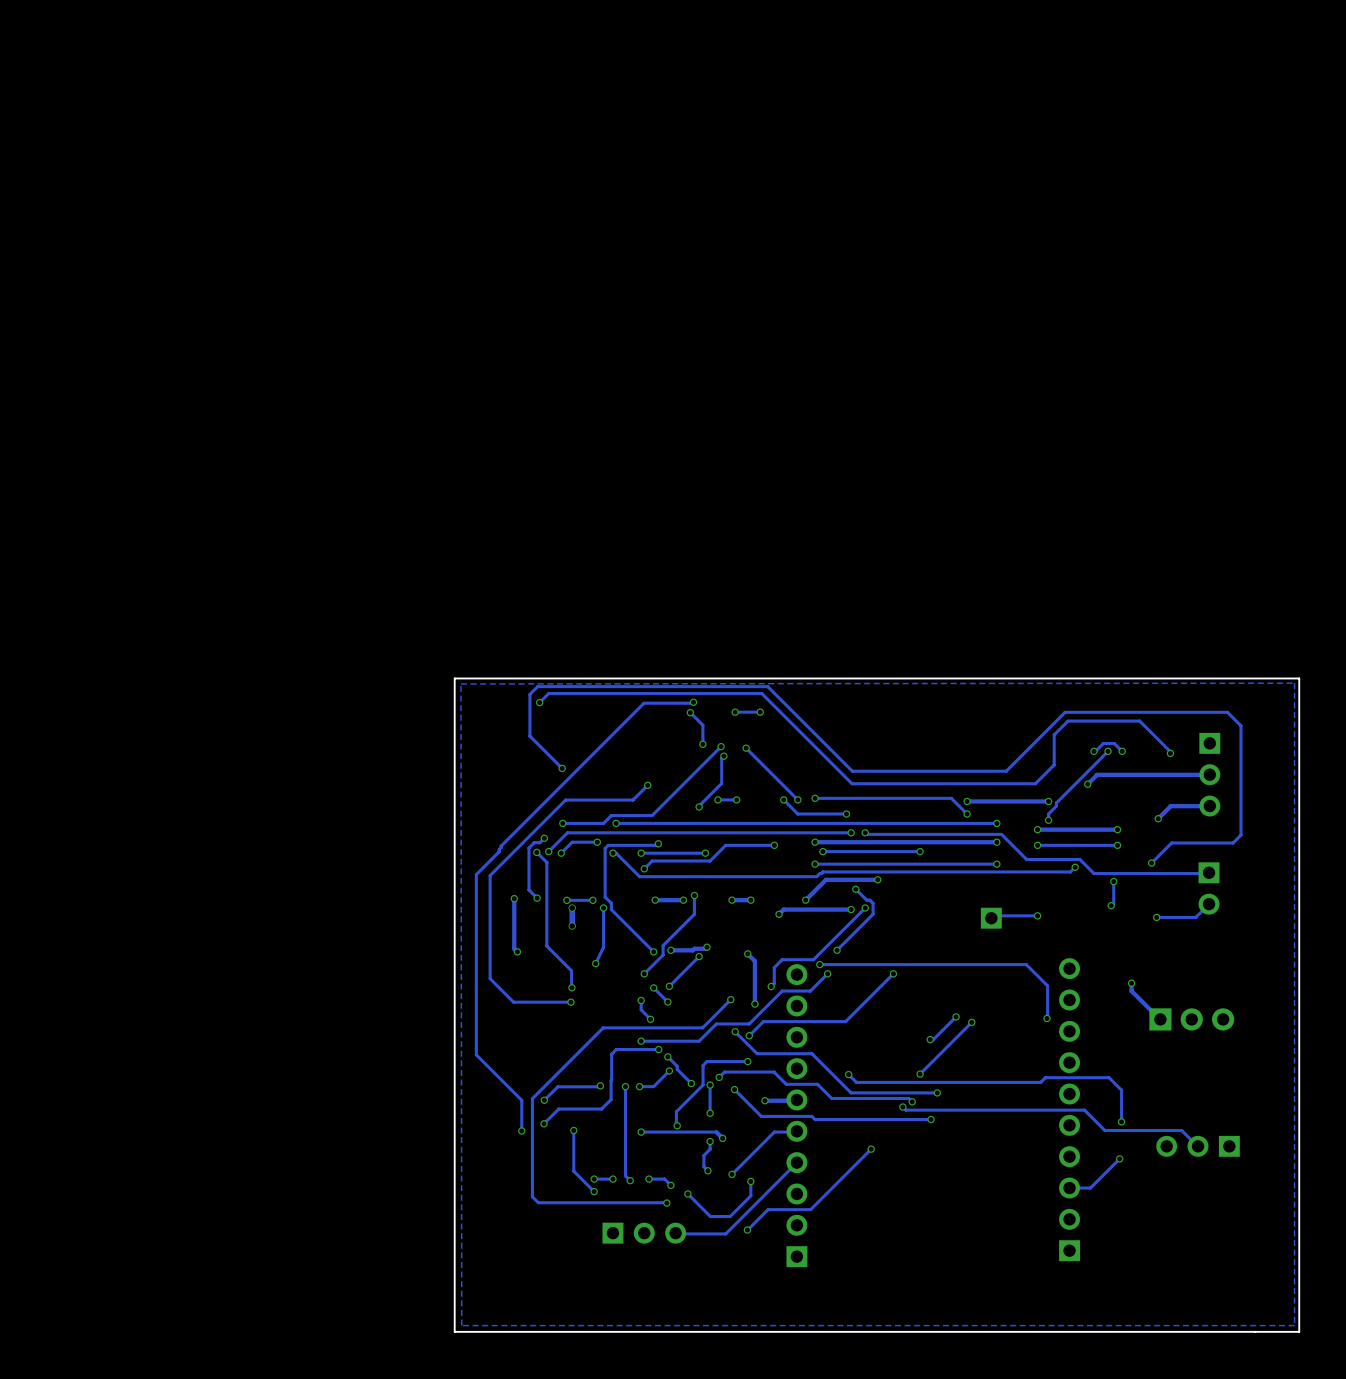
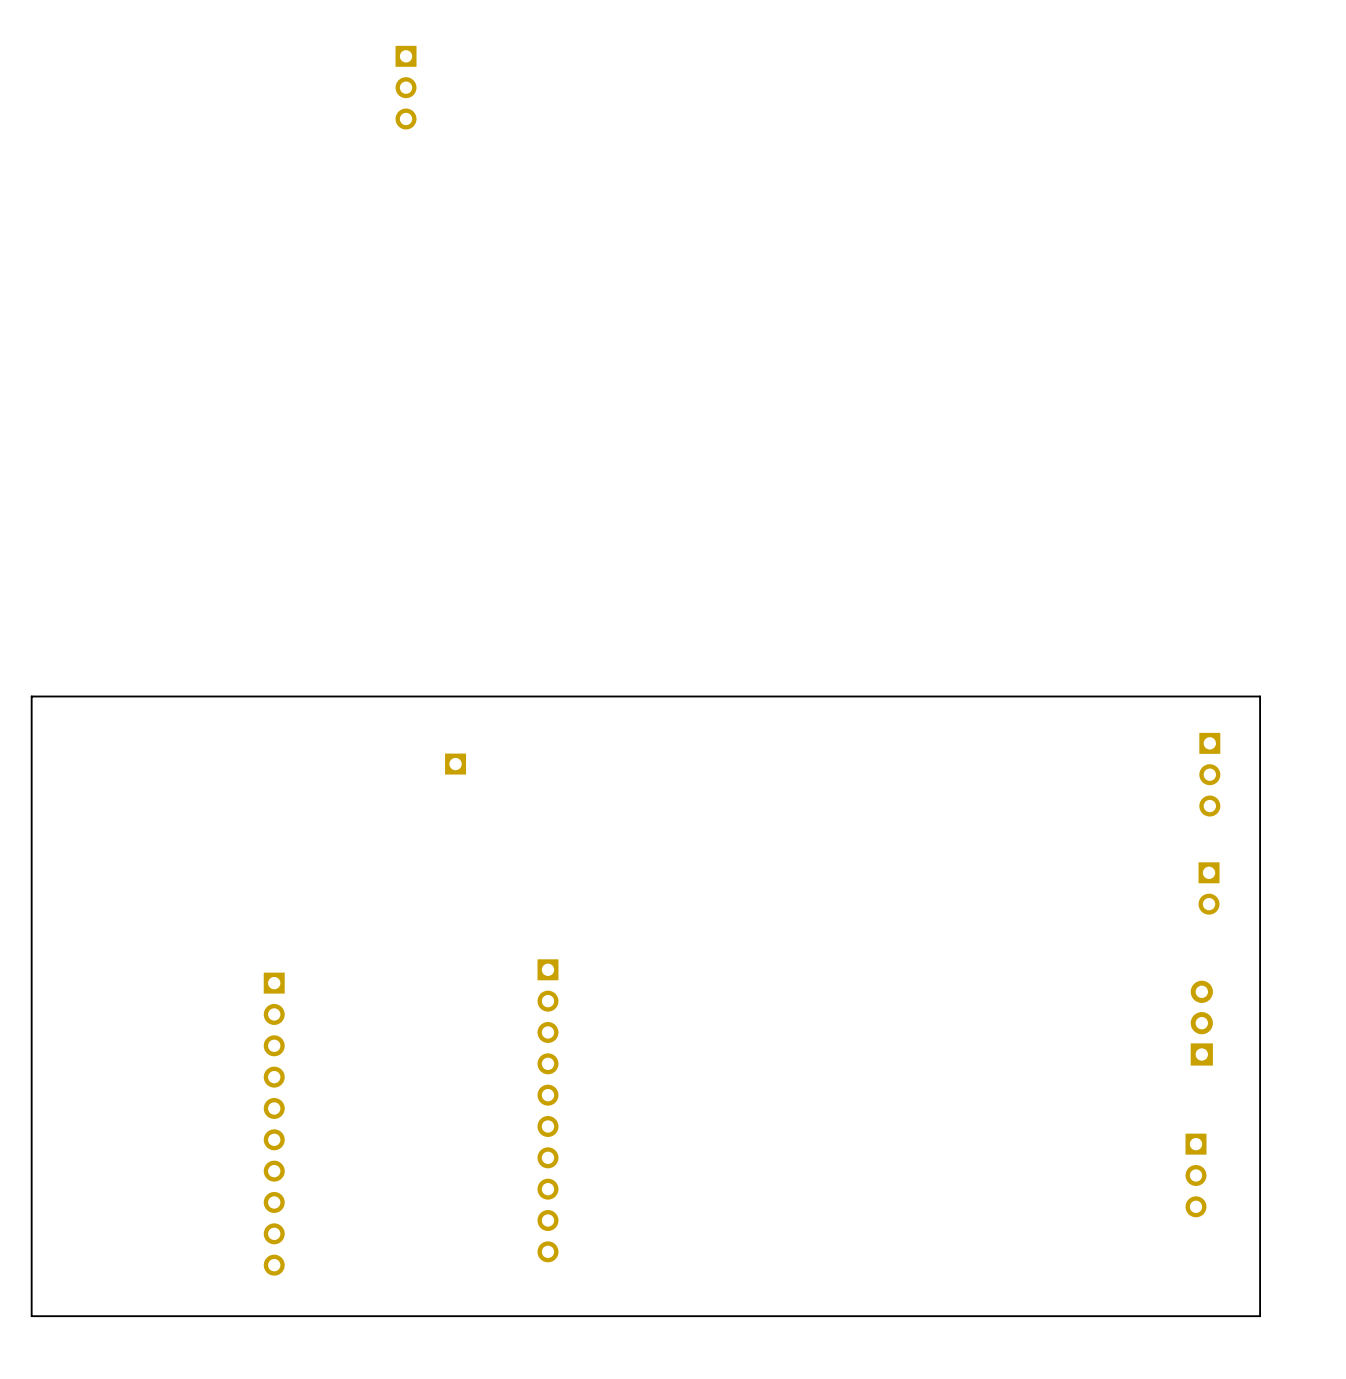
part: none -> (406, 87)
board edge: (1299, 678) (454, 678) (454, 1331) (1299, 1331) (1299, 678) -> (1260, 696) (1260, 1316) (31, 1316) (31, 696) (1260, 696)
zone outline: (1294, 683) (1294, 1325) (461, 1325) (460, 683) (1294, 683) -> none
track: (539, 702) (548, 693) (761, 693) (852, 783) (1035, 783) (1054, 764) (1054, 734) (1067, 721) (1139, 721) (1170, 753) -> none
via: (539, 702) -> none
track: (693, 702) (643, 703) (501, 846) (499, 851) (476, 874) (476, 1054) (521, 1100) (521, 1130) -> none
via: (693, 702) -> none
track: (690, 712) (702, 725) (702, 744) -> none
via: (690, 712) -> none
via: (735, 712) -> none
track: (760, 712) (735, 712) -> none
via: (760, 712) -> none
via: (702, 744) -> none
track: (721, 746) (652, 815) (611, 815) (603, 823) (562, 823) -> none
via: (721, 746) -> none
track: (746, 748) (797, 799) -> none
via: (746, 748) -> none
via: (1093, 751) -> none
track: (1108, 751) (1056, 803) (1056, 806) (1048, 814) (1048, 820) -> none
via: (1108, 751) -> none
track: (1122, 751) (1114, 743) (1103, 743) (1093, 751) -> none
via: (1122, 751) -> none
via: (1170, 753) -> none
track: (723, 756) (721, 758) (721, 783) (699, 806) -> none
via: (723, 756) -> none
part: none -> (455, 764)
track: (562, 768) (529, 736) (529, 694) (537, 686) (767, 686) (852, 771) (1006, 771) (1065, 712) (1227, 712) (1240, 725) (1240, 835) (1233, 842) (1171, 842) (1151, 863) -> none
via: (562, 768) -> none
track: (1209, 774) (1097, 774) (1087, 784) -> none
via: (1087, 784) -> none
track: (647, 785) (633, 800) (565, 800) (490, 875) (490, 978) (513, 1002) (570, 1002) -> none
via: (647, 785) -> none
track: (815, 798) (951, 798) (967, 814) -> none
via: (815, 798) -> none
via: (717, 799) -> none
track: (736, 799) (717, 799) -> none
via: (736, 799) -> none
track: (783, 799) (797, 814) (846, 814) -> none
via: (783, 799) -> none
via: (797, 799) -> none
via: (967, 801) -> none
track: (1048, 801) (967, 801) -> none
via: (1048, 801) -> none
via: (699, 806) -> none
track: (1209, 806) (1170, 806) (1158, 818) -> none
via: (846, 814) -> none
via: (967, 814) -> none
via: (1158, 818) -> none
via: (1048, 820) -> none
via: (562, 823) -> none
via: (616, 823) -> none
track: (996, 823) (616, 823) -> none
via: (996, 823) -> none
via: (1037, 829) -> none
track: (1117, 829) (1037, 829) -> none
via: (1117, 829) -> none
track: (851, 832) (567, 832) (548, 851) -> none
via: (851, 832) -> none
track: (865, 832) (866, 834) (1001, 834) (1026, 859) (1079, 859) (1093, 873) (1209, 872) -> none
via: (865, 832) -> none
track: (544, 838) (539, 842) (534, 842) (528, 848) (528, 890) (537, 898) -> none
via: (544, 838) -> none
track: (597, 842) (572, 842) (561, 853) -> none
via: (597, 842) -> none
via: (815, 842) -> none
track: (996, 842) (815, 842) -> none
via: (996, 842) -> none
track: (658, 843) (656, 845) (608, 845) (605, 848) (605, 897) (611, 903) (611, 909) (653, 951) -> none
via: (658, 843) -> none
track: (774, 845) (725, 845) (710, 861) (652, 861) (644, 868) -> none
via: (774, 845) -> none
via: (1037, 845) -> none
track: (1117, 845) (1037, 845) -> none
via: (1117, 845) -> none
via: (548, 851) -> none
via: (822, 851) -> none
track: (920, 851) (822, 851) -> none
via: (920, 851) -> none
track: (536, 852) (546, 862) (546, 946) (571, 970) (571, 987) -> none
via: (536, 852) -> none
via: (561, 853) -> none
track: (612, 853) (616, 853) (639, 876) (816, 876) (822, 871) (1070, 871) (1075, 867) -> none
via: (612, 853) -> none
via: (641, 853) -> none
track: (705, 853) (641, 853) -> none
via: (705, 853) -> none
via: (1151, 863) -> none
via: (815, 864) -> none
track: (996, 864) (815, 864) -> none
via: (996, 864) -> none
via: (1075, 867) -> none
via: (644, 868) -> none
track: (877, 879) (826, 879) (805, 900) -> none
via: (877, 879) -> none
track: (1113, 881) (1113, 903) (1111, 905) -> none
via: (1113, 881) -> none
track: (855, 889) (866, 900) (873, 903) (873, 914) (837, 950) -> none
via: (855, 889) -> none
track: (694, 895) (694, 914) (663, 945) (663, 955) (644, 973) -> none
via: (694, 895) -> none
track: (514, 898) (514, 948) (517, 951) -> none
via: (514, 898) -> none
via: (537, 898) -> none
via: (566, 900) -> none
track: (592, 900) (566, 900) -> none
via: (592, 900) -> none
via: (655, 900) -> none
track: (683, 900) (655, 900) -> none
via: (683, 900) -> none
via: (732, 900) -> none
track: (750, 900) (732, 900) -> none
via: (750, 900) -> none
via: (805, 900) -> none
track: (1209, 904) (1195, 917) (1156, 917) -> none
via: (1111, 905) -> none
track: (572, 908) (572, 926) -> none
via: (572, 908) -> none
track: (603, 908) (603, 947) (595, 963) -> none
via: (603, 908) -> none
track: (865, 908) (813, 959) (782, 959) (774, 967) (774, 983) (771, 986) -> none
via: (865, 908) -> none
track: (851, 909) (783, 909) (779, 914) -> none
via: (851, 909) -> none
via: (779, 914) -> none
track: (1037, 915) (995, 915) (991, 918) -> none
via: (1037, 915) -> none
via: (1156, 917) -> none
part: (991, 918) -> none
via: (572, 926) -> none
track: (706, 947) (692, 950) (670, 950) -> none
via: (706, 947) -> none
via: (670, 950) -> none
via: (837, 950) -> none
via: (517, 951) -> none
via: (653, 951) -> none
track: (747, 953) (754, 961) (754, 1004) -> none
via: (747, 953) -> none
track: (699, 956) (669, 986) -> none
via: (699, 956) -> none
via: (595, 963) -> none
track: (819, 964) (1026, 964) (1047, 985) (1046, 1018) -> none
via: (819, 964) -> none
via: (644, 973) -> none
track: (827, 973) (810, 991) (782, 991) (749, 1023) (716, 1023) (699, 1041) (641, 1041) -> none
via: (827, 973) -> none
track: (893, 973) (845, 1021) (763, 1021) (749, 1035) -> none
via: (893, 973) -> none
track: (1131, 983) (1131, 991) (1160, 1019) -> none
via: (1131, 983) -> none
via: (669, 986) -> none
via: (771, 986) -> none
via: (571, 987) -> none
track: (653, 987) (667, 1002) -> none
via: (653, 987) -> none
track: (730, 999) (702, 1027) (603, 1027) (532, 1098) (532, 1196) (538, 1202) (666, 1203) -> none
via: (730, 999) -> none
track: (641, 1000) (641, 1009) (650, 1019) -> none
via: (641, 1000) -> none
via: (570, 1002) -> none
via: (667, 1002) -> none
via: (754, 1004) -> none
track: (956, 1016) (933, 1039) (930, 1039) -> none
via: (956, 1016) -> none
via: (1046, 1018) -> none
via: (650, 1019) -> none
part rotation: 0° (1191, 1019) -> 90° counterclockwise (1201, 1023)
track: (971, 1022) (920, 1074) -> none
via: (971, 1022) -> none
track: (735, 1031) (757, 1053) (811, 1053) (851, 1092) (937, 1092) -> none
via: (735, 1031) -> none
via: (749, 1035) -> none
via: (930, 1039) -> none
via: (641, 1041) -> none
track: (658, 1049) (616, 1049) (611, 1054) (611, 1099) (601, 1109) (558, 1109) (544, 1123) -> none
via: (658, 1049) -> none
track: (667, 1056) (691, 1083) -> none
via: (667, 1056) -> none
track: (747, 1061) (706, 1061) (703, 1065) (703, 1085) (676, 1111) (677, 1125) -> none
via: (747, 1061) -> none
track: (669, 1070) (653, 1086) (639, 1086) -> none
via: (669, 1070) -> none
track: (848, 1074) (856, 1082) (1040, 1082) (1045, 1077) (1109, 1077) (1121, 1090) (1121, 1121) -> none
via: (848, 1074) -> none
via: (920, 1074) -> none
track: (719, 1077) (724, 1072) (774, 1072) (786, 1084) (817, 1084) (831, 1098) (908, 1098) (912, 1101) -> none
via: (719, 1077) -> none
via: (691, 1083) -> none
track: (600, 1085) (557, 1086) (544, 1100) -> none
via: (600, 1085) -> none
track: (710, 1085) (710, 1113) -> none
via: (710, 1085) -> none
track: (625, 1086) (625, 1175) (630, 1180) -> none
via: (625, 1086) -> none
via: (639, 1086) -> none
track: (734, 1089) (761, 1116) (811, 1116) (815, 1119) (931, 1119) -> none
via: (734, 1089) -> none
via: (937, 1092) -> none
track: (796, 1099) (764, 1100) -> none
via: (544, 1100) -> none
via: (764, 1100) -> none
via: (912, 1101) -> none
track: (902, 1107) (905, 1110) (1084, 1110) (1104, 1130) (1181, 1130) (1198, 1146) -> none
via: (902, 1107) -> none
part: (1069, 1109) -> none
via: (710, 1113) -> none
part rotation: 0° (796, 1115) -> 180° (547, 1110)
part position: (796, 1115) -> (547, 1110)
via: (931, 1119) -> none
via: (1121, 1121) -> none
via: (544, 1123) -> none
part: none -> (274, 1124)
via: (677, 1125) -> none
via: (521, 1130) -> none
track: (573, 1130) (573, 1171) (594, 1191) -> none
via: (573, 1130) -> none
track: (796, 1131) (774, 1132) (732, 1174) -> none
track: (641, 1132) (716, 1132) (722, 1138) -> none
via: (641, 1132) -> none
via: (722, 1138) -> none
track: (710, 1141) (710, 1149) (703, 1155) (703, 1166) (707, 1170) -> none
via: (710, 1141) -> none
part rotation: 0° (1198, 1146) -> 90° counterclockwise (1195, 1175)
track: (871, 1149) (810, 1209) (768, 1209) (747, 1230) -> none
via: (871, 1149) -> none
track: (1119, 1158) (1090, 1188) (1069, 1188) -> none
via: (1119, 1158) -> none
track: (796, 1162) (725, 1233) (675, 1233) -> none
via: (707, 1170) -> none
via: (732, 1174) -> none
via: (594, 1179) -> none
track: (612, 1179) (594, 1179) -> none
via: (612, 1179) -> none
track: (649, 1179) (664, 1179) (670, 1185) -> none
via: (649, 1179) -> none
via: (630, 1180) -> none
track: (750, 1181) (750, 1195) (730, 1216) (710, 1216) (687, 1193) -> none
via: (750, 1181) -> none
via: (670, 1185) -> none
via: (594, 1191) -> none
via: (687, 1193) -> none
via: (666, 1203) -> none
via: (747, 1230) -> none
part: (644, 1233) -> none

